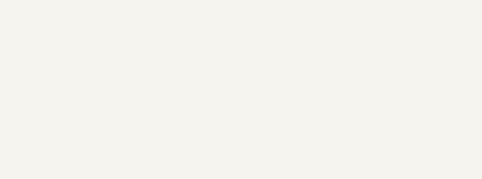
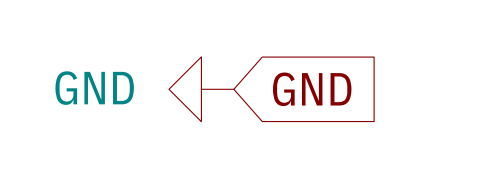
power symbol: none -> GND (201, 89)
global label: none -> GND (312, 89)

